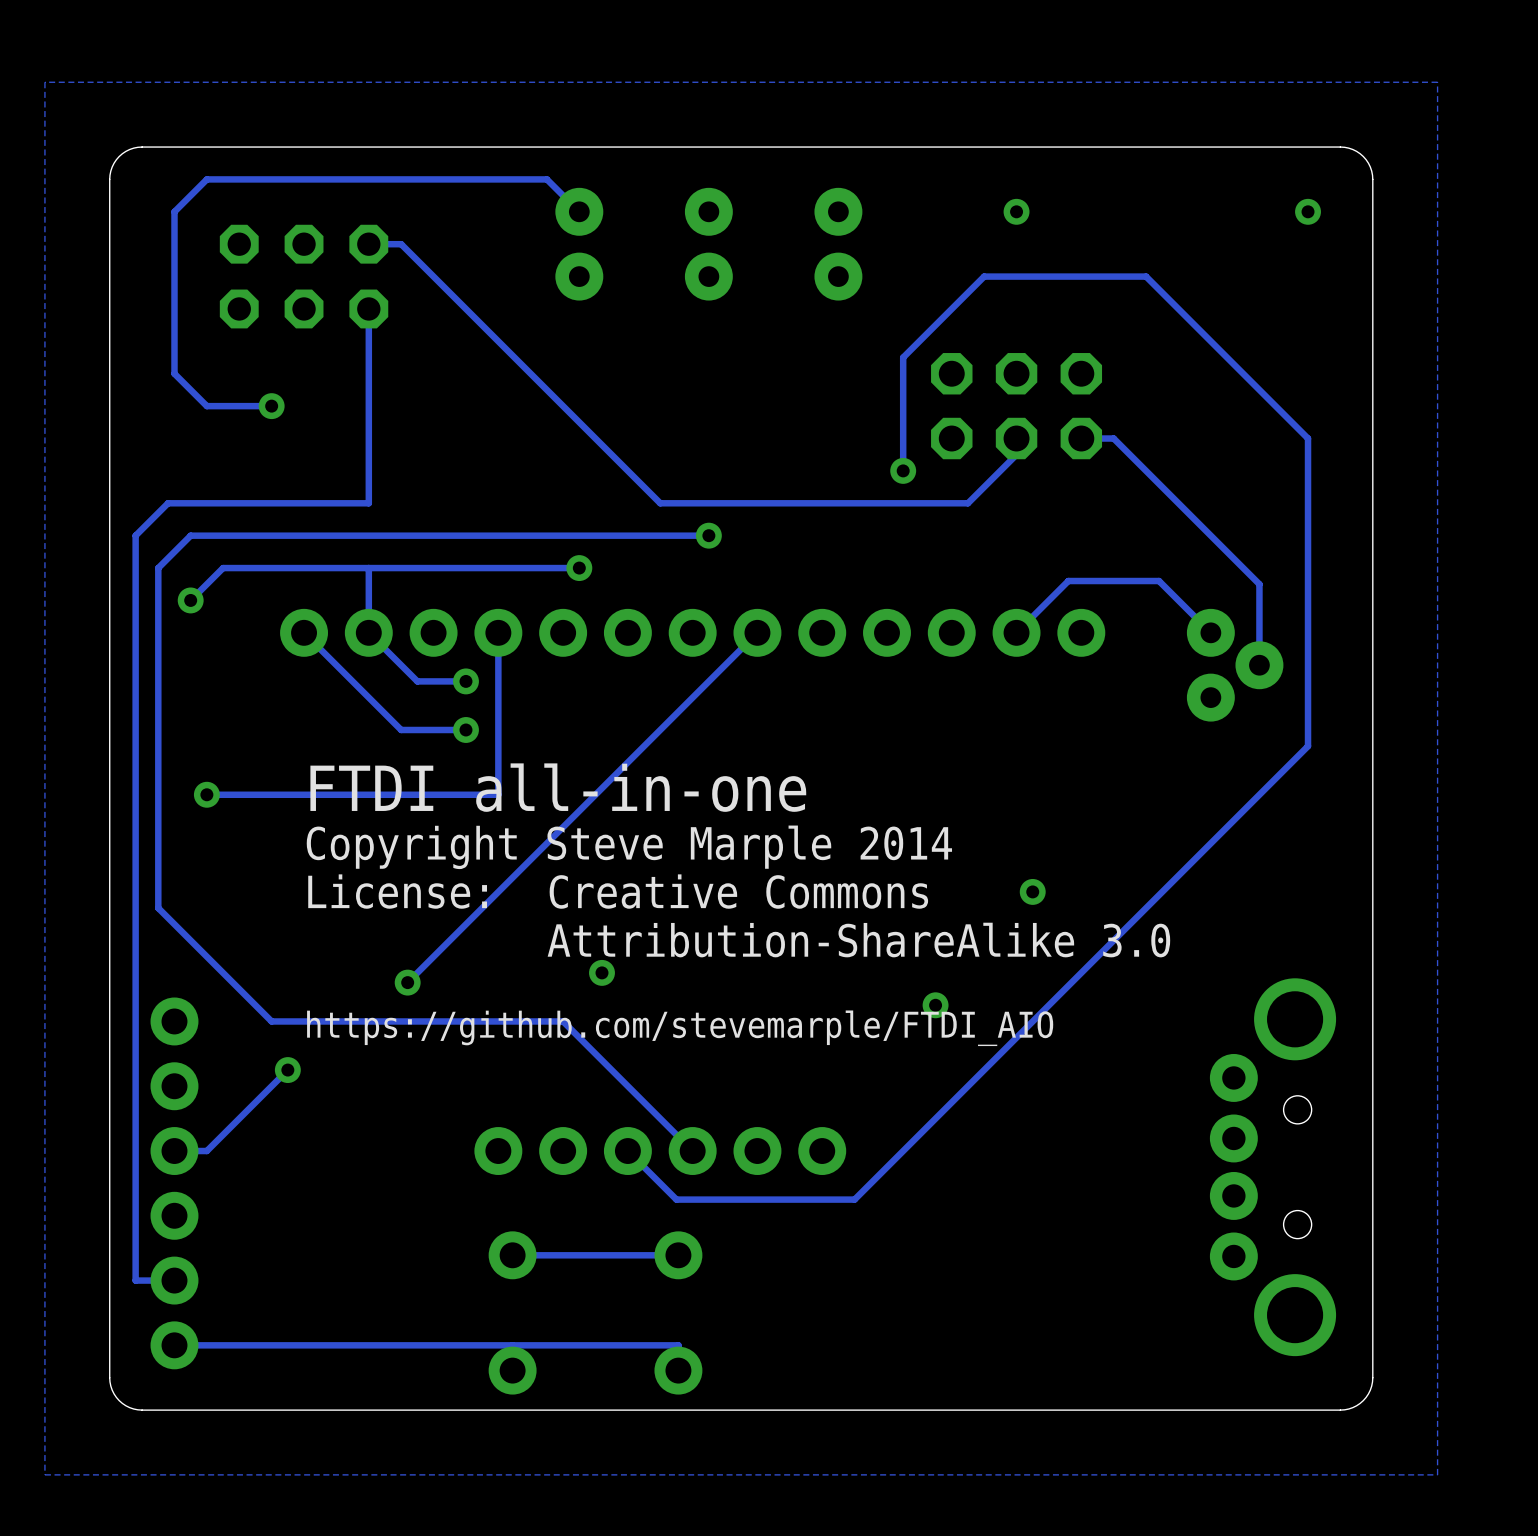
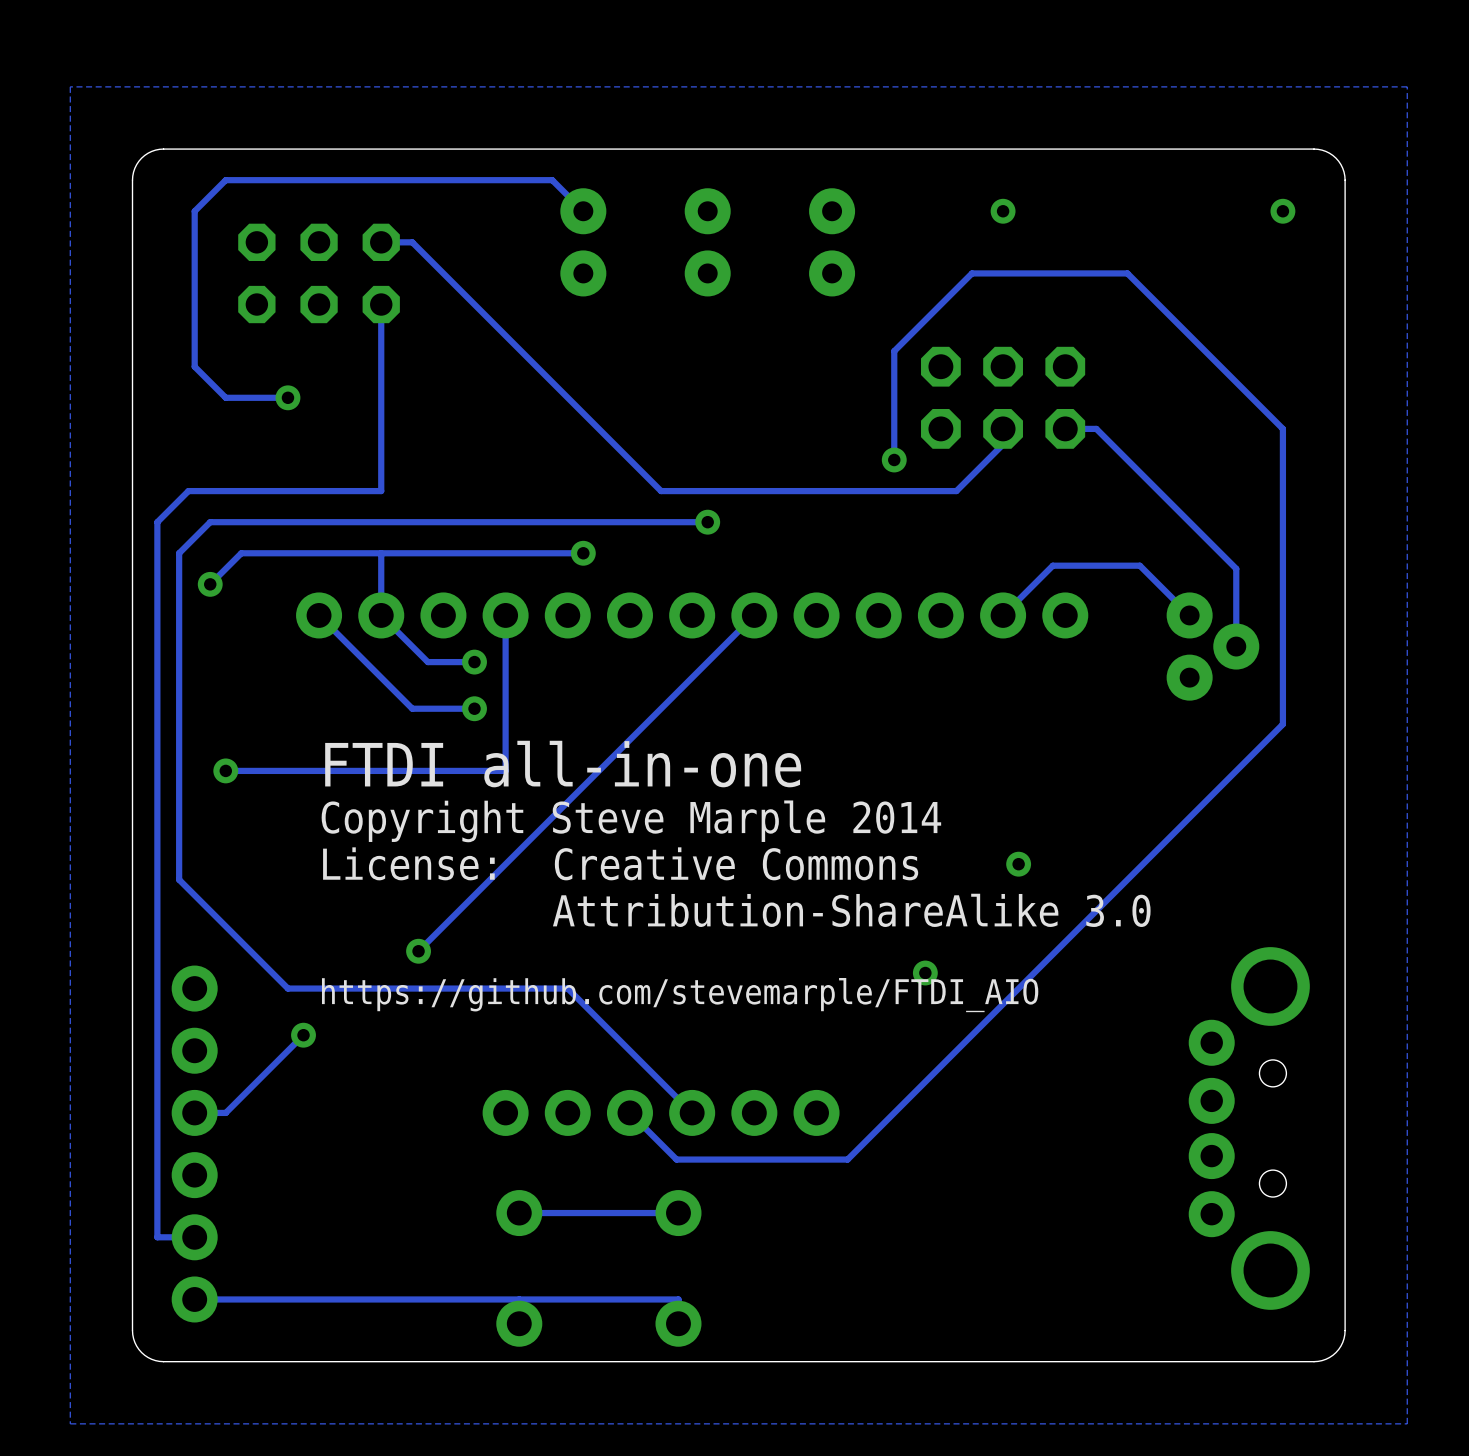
via: (601, 972) -> none

